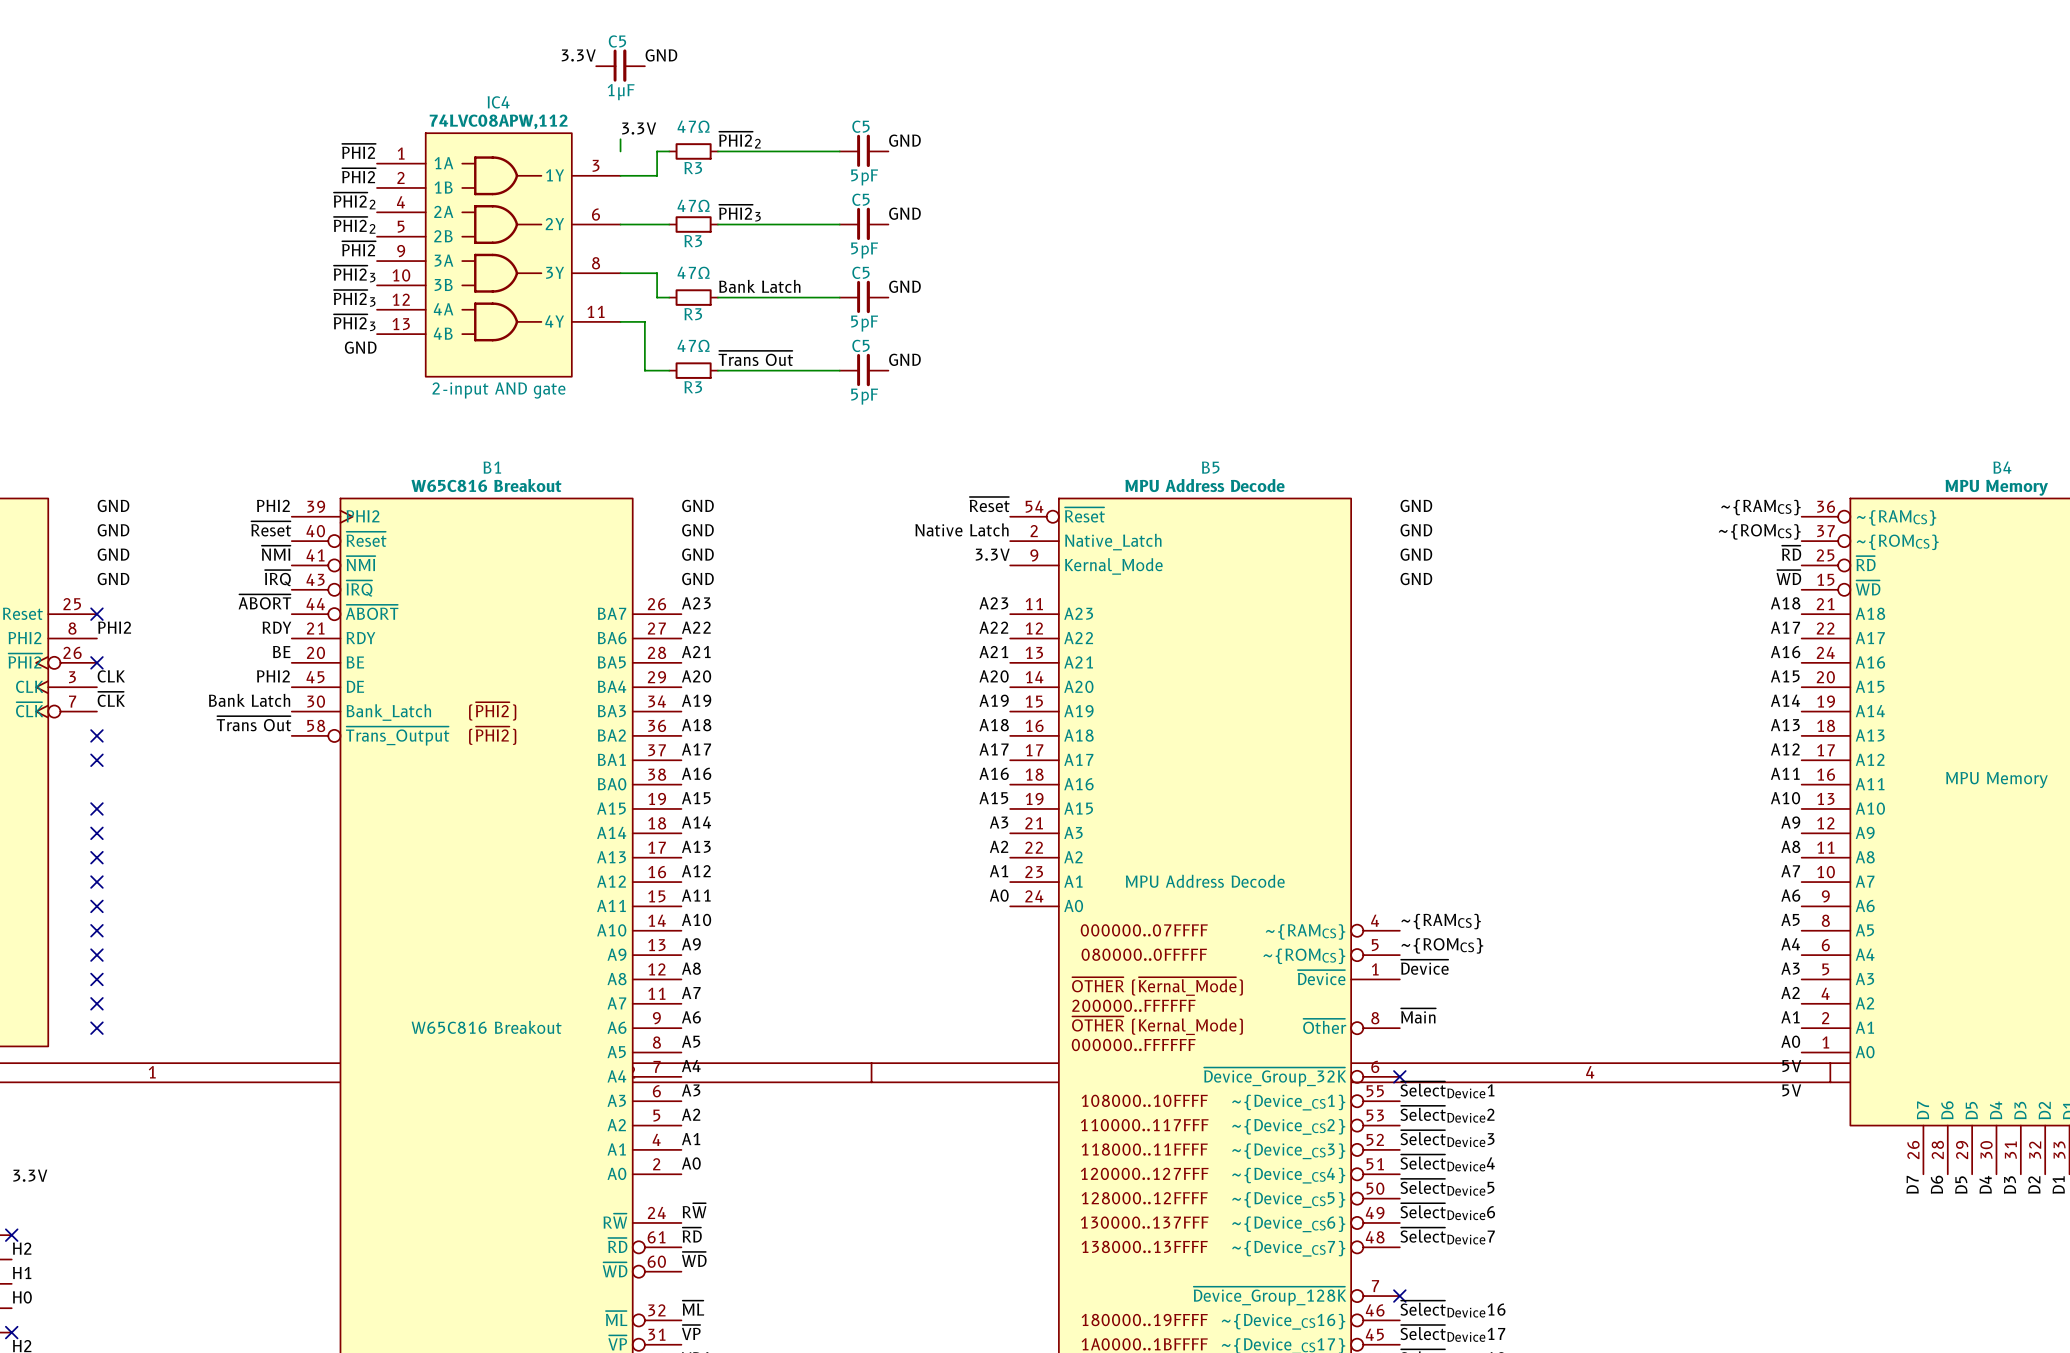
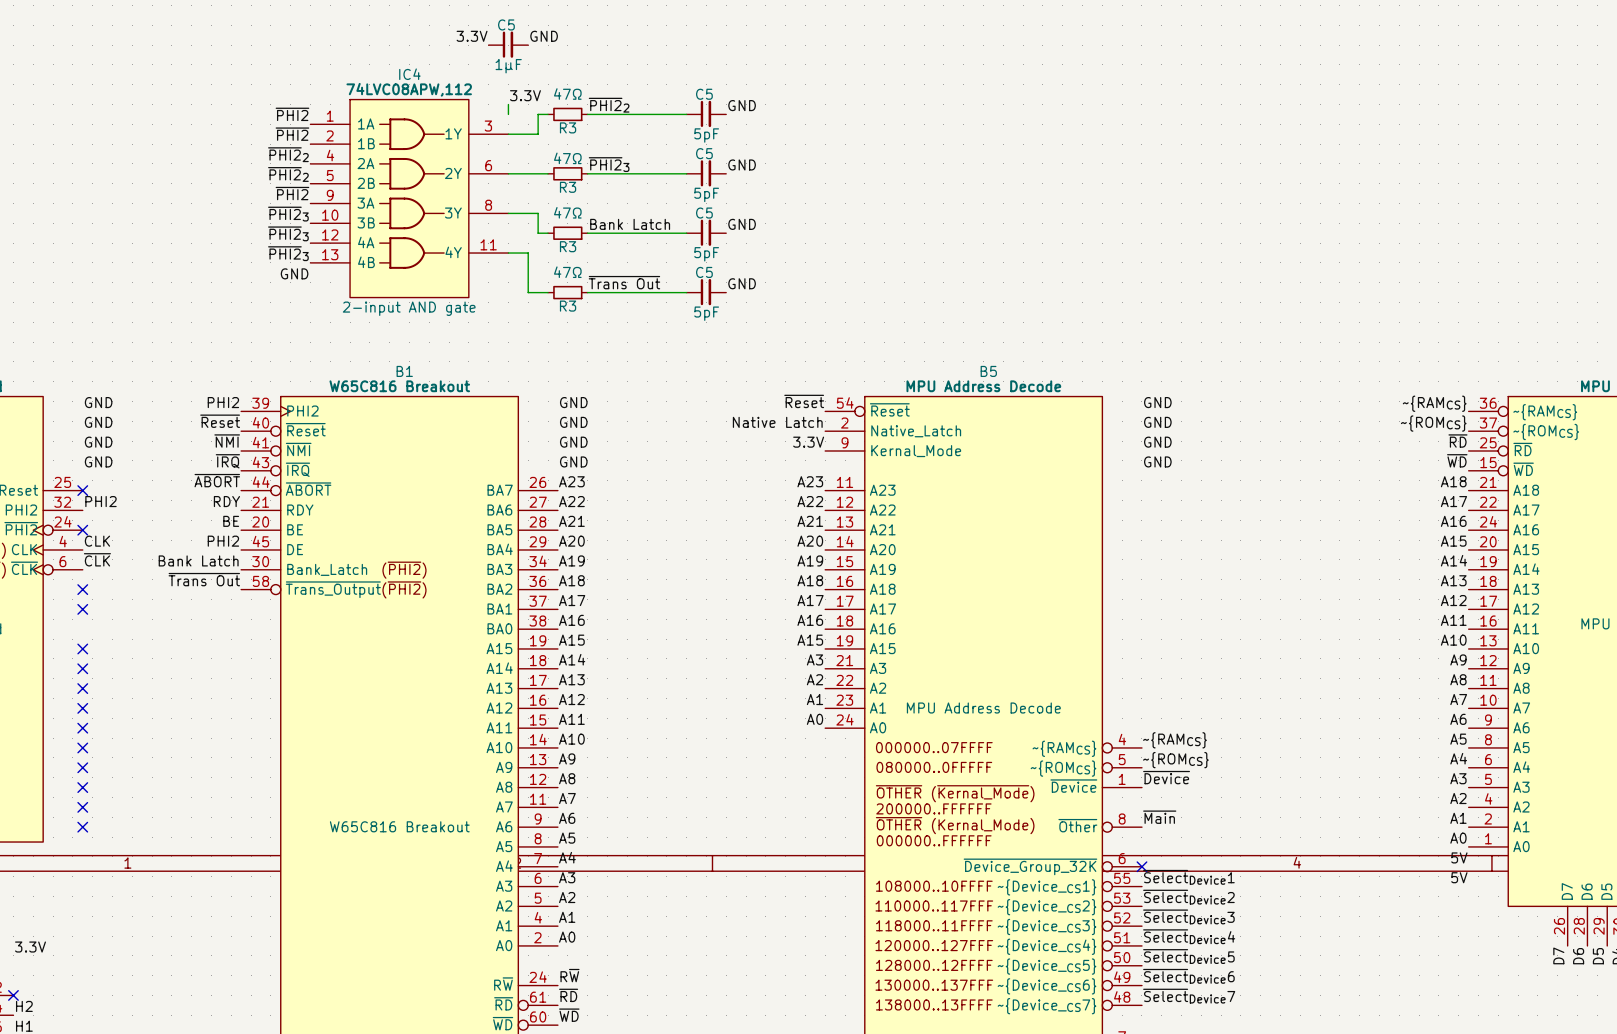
part pin number: 8 (72, 628) -> 32 (62, 502)
part pin number: 26 (72, 652) -> 24 (62, 521)
part pin number: 3 (72, 677) -> 4 (63, 541)
part pin number: 7 (72, 701) -> 6 (62, 561)

